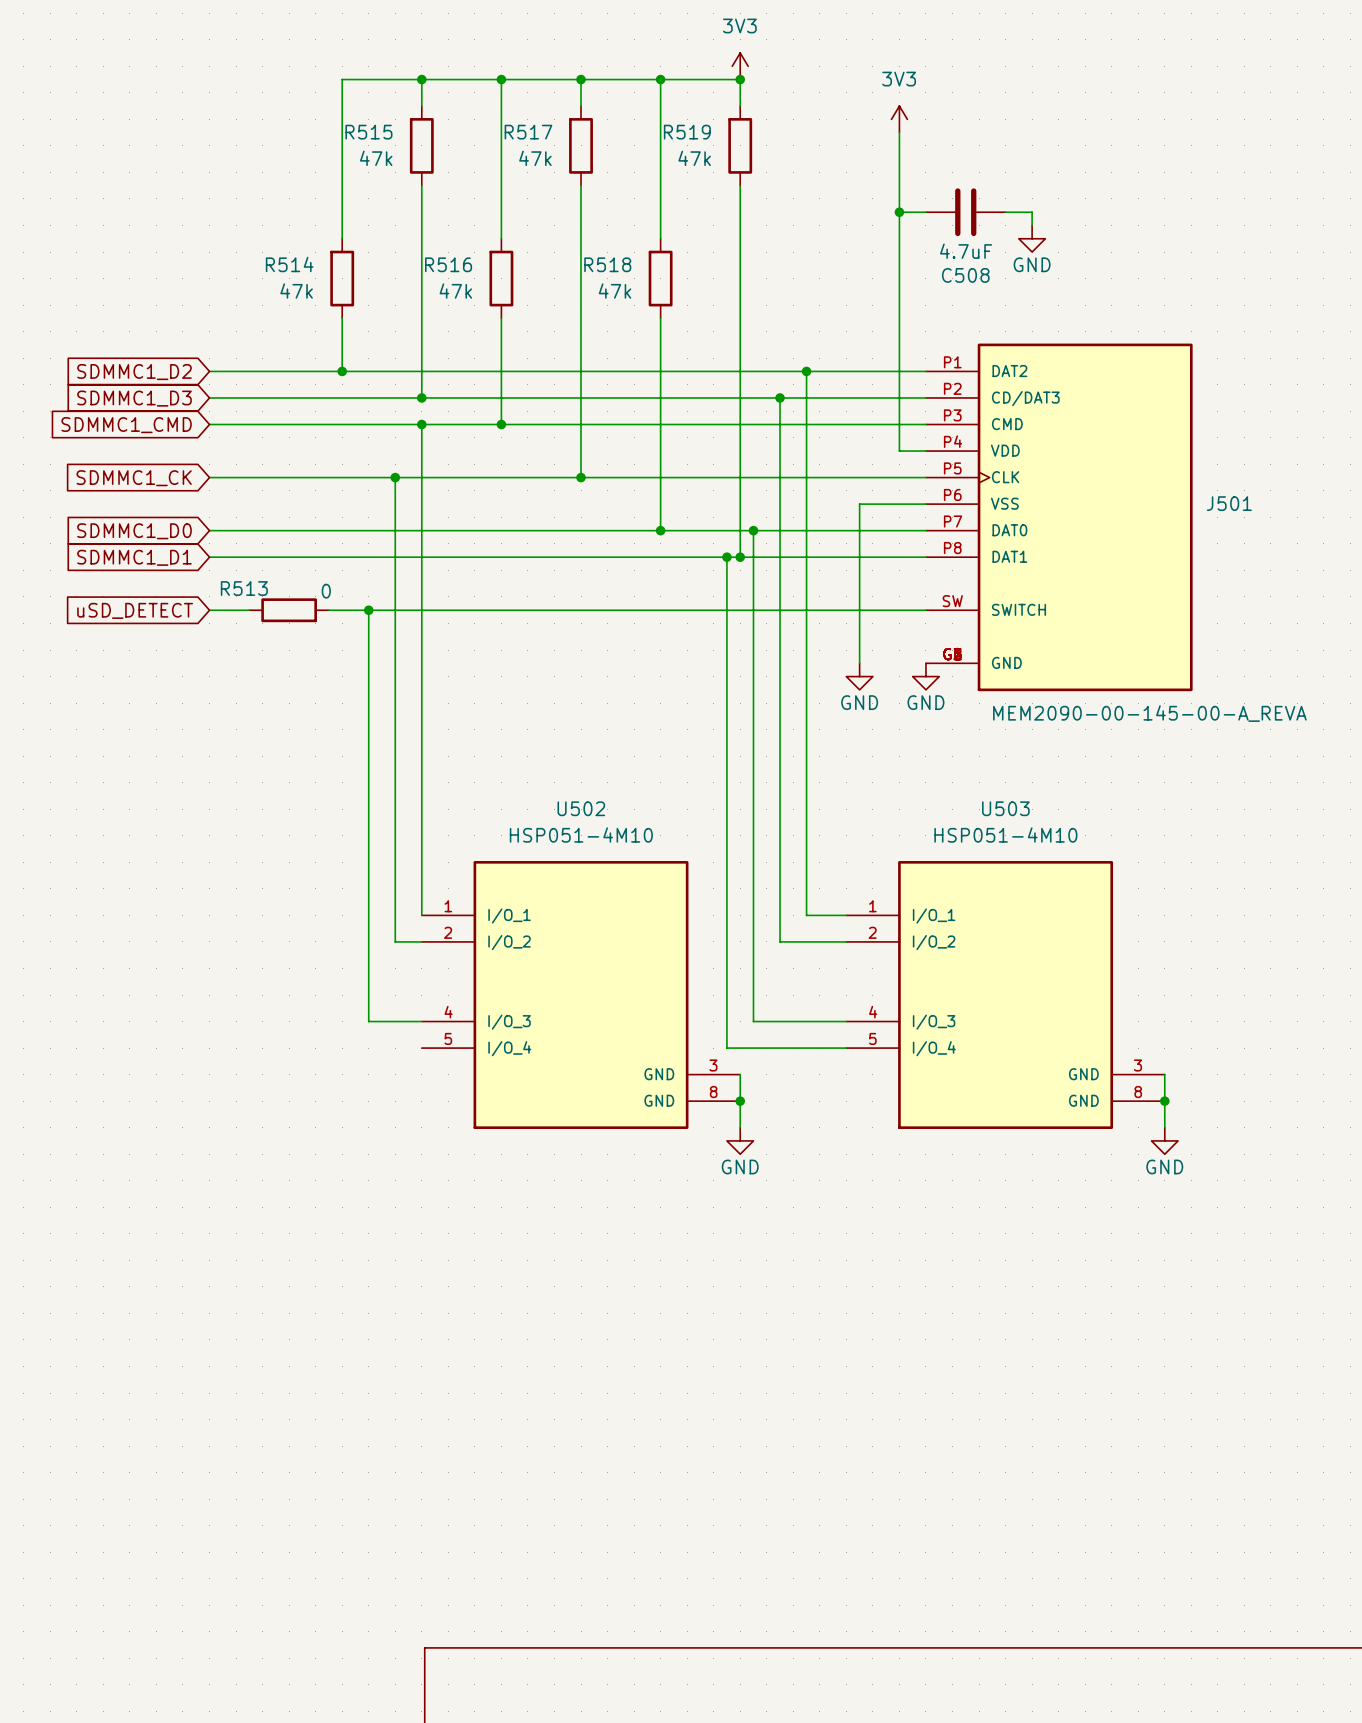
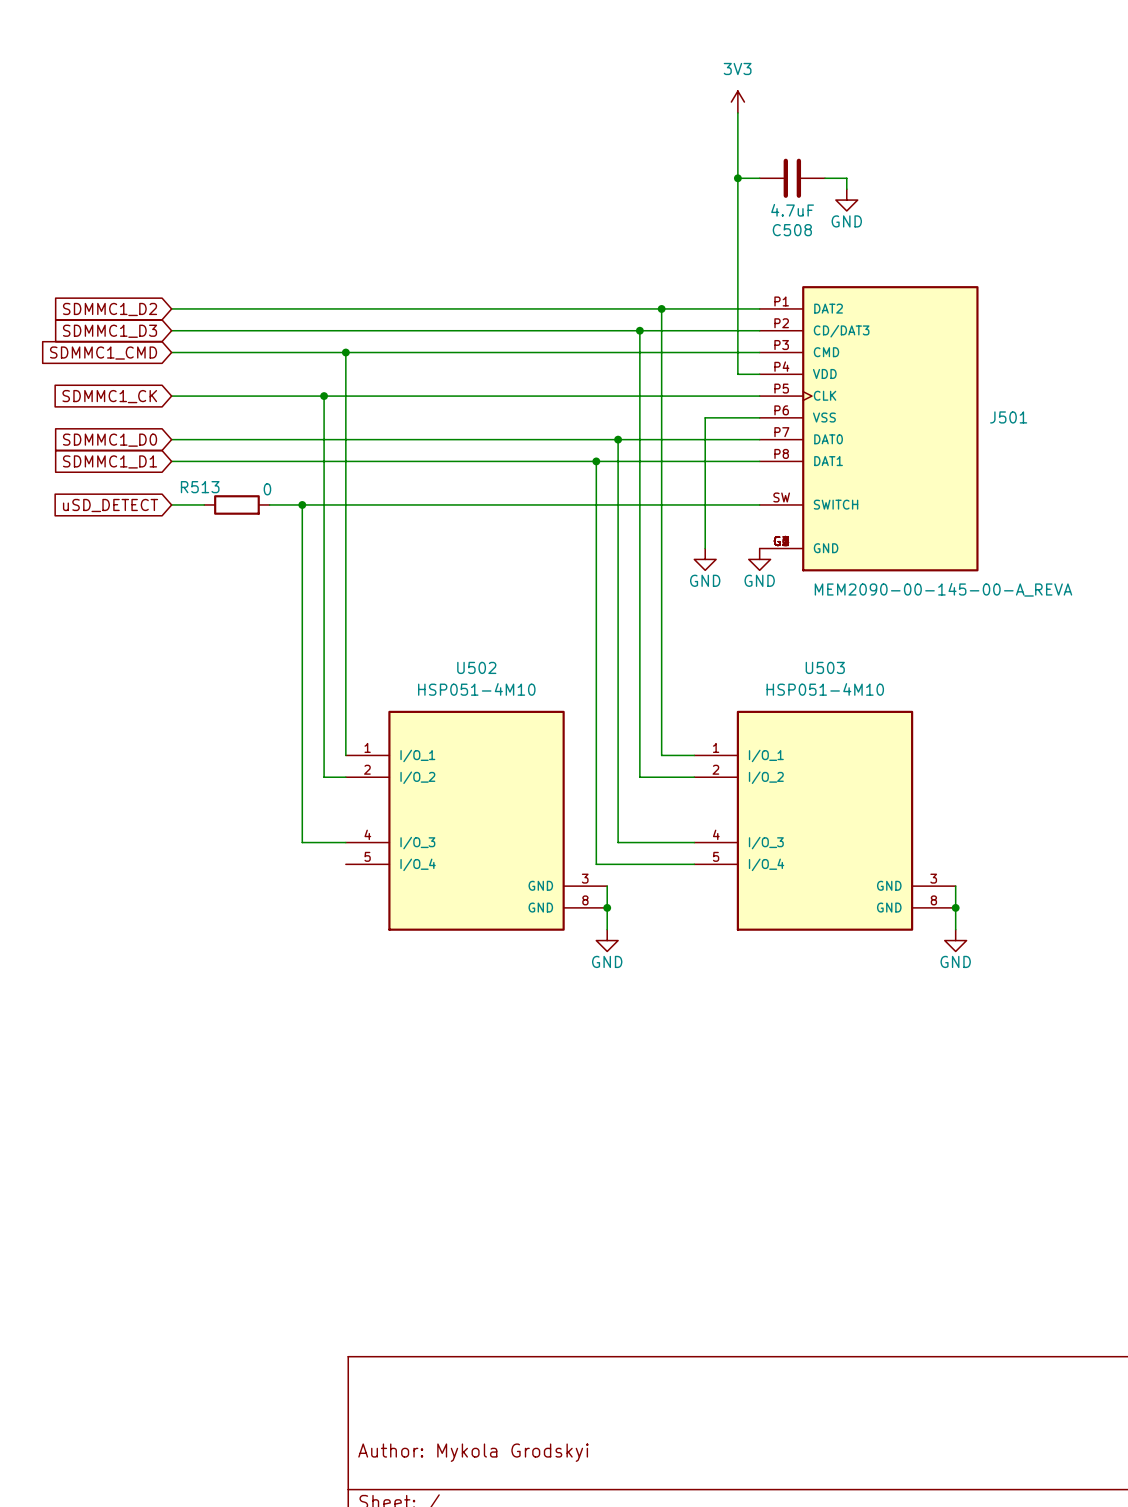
power symbol: 3V3 (740, 66) -> none
wire: (421, 79) (421, 106) -> none
junction: (421, 79) -> none
wire: (501, 79) (501, 238) -> none
junction: (501, 79) -> none
wire: (581, 79) (581, 106) -> none
junction: (581, 79) -> none
wire: (660, 79) (660, 238) -> none
junction: (660, 79) -> none
junction: (740, 79) -> none
wire: (740, 106) (740, 79) (342, 79) (342, 238) -> none
R515: 47k (421, 145) -> none
R517: 47k (581, 145) -> none
R519: 47k (740, 145) -> none
wire: (421, 185) (421, 397) -> none
wire: (581, 185) (581, 477) -> none
wire: (740, 185) (740, 557) -> none
R514: 47k (342, 278) -> none
R516: 47k (501, 278) -> none
R518: 47k (660, 278) -> none
wire: (342, 318) (342, 371) -> none
wire: (501, 318) (501, 424) -> none
wire: (660, 318) (660, 530) -> none
junction: (342, 371) -> none
junction: (421, 397) -> none
junction: (501, 424) -> none
junction: (581, 477) -> none
junction: (660, 530) -> none
junction: (740, 557) -> none

